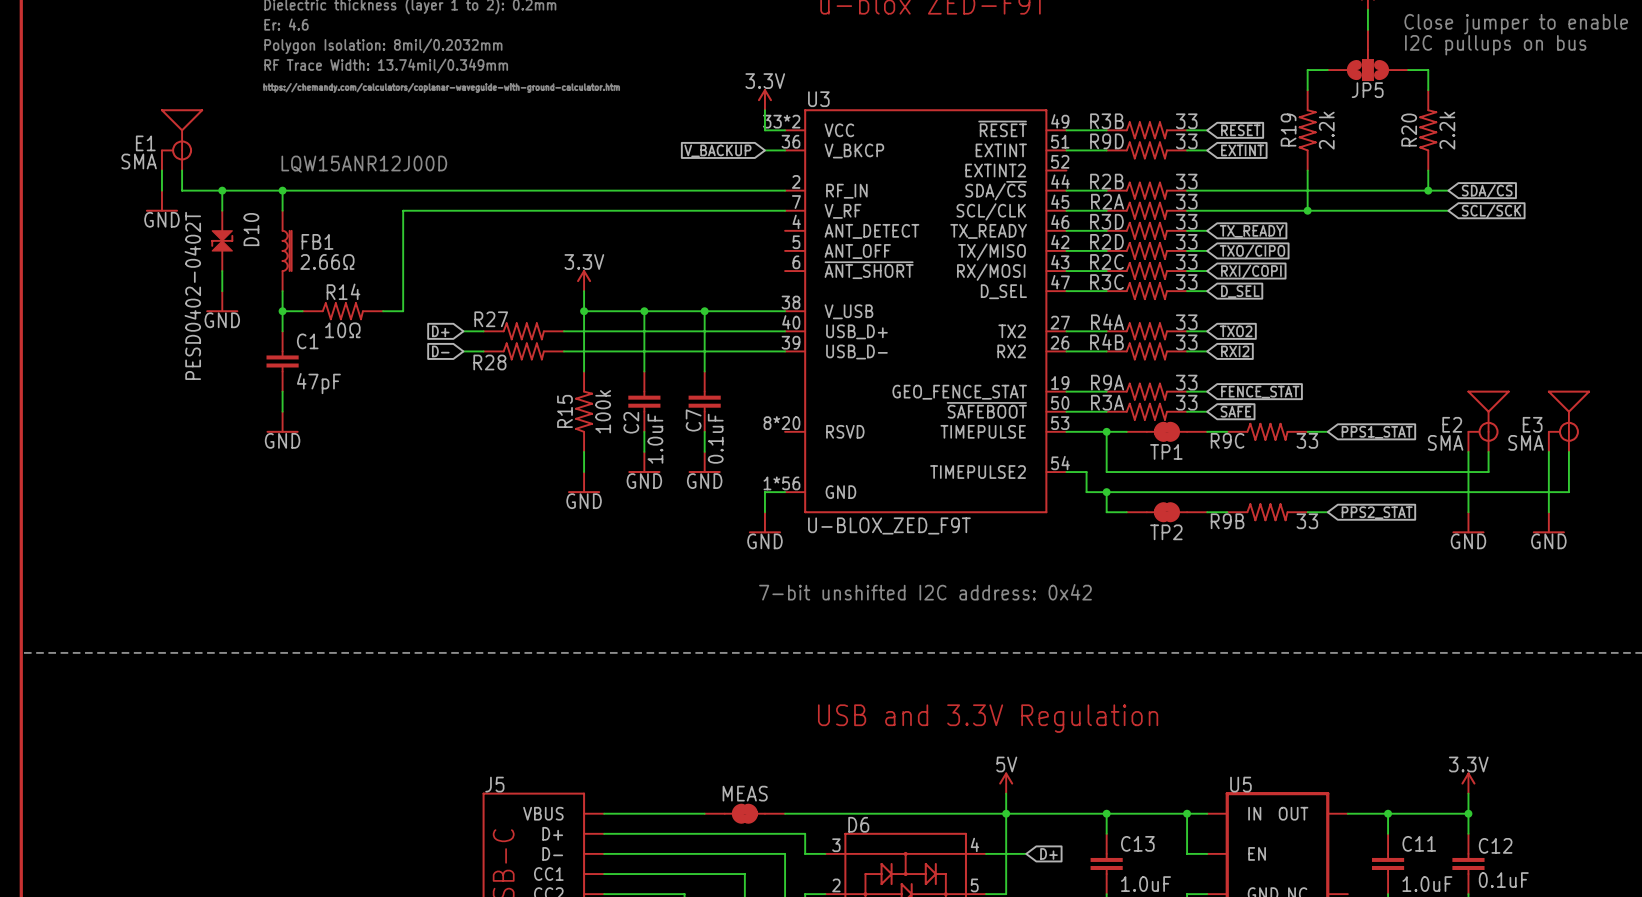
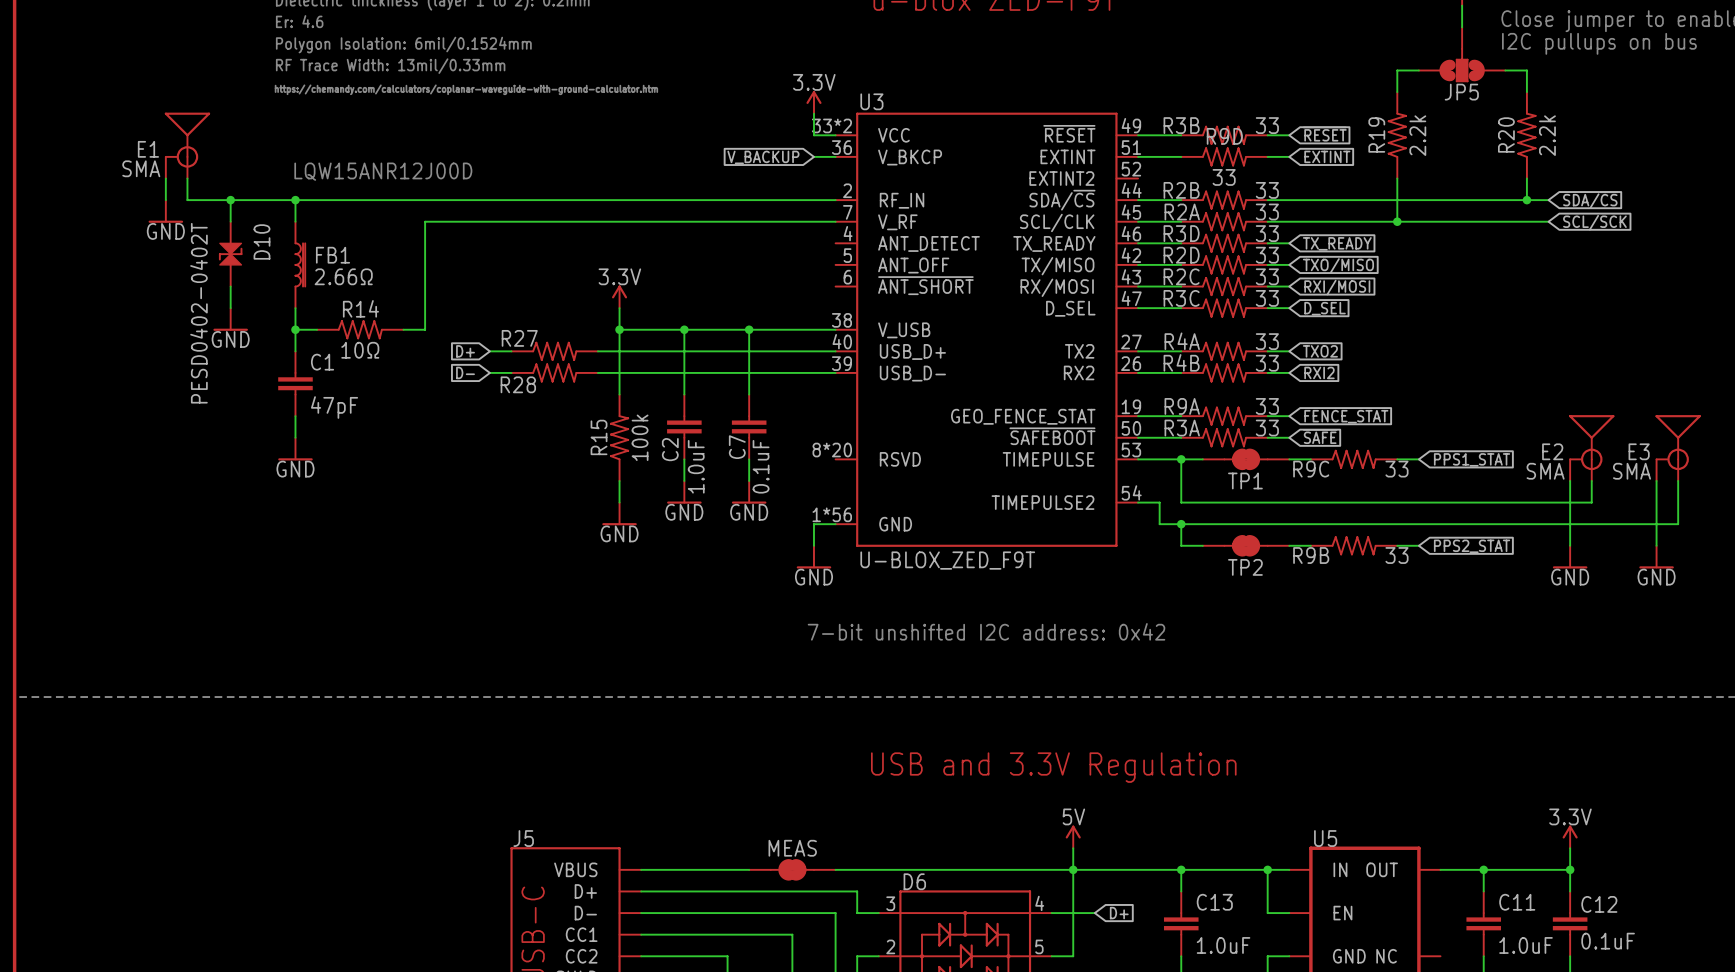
text: Polygon Isolation: 8mil/0.2032mm (383, 46) -> Polygon Isolation: 6mil/0.1524mm (403, 45)
text: RF Trace Width: 13.74mil/0.349mm (386, 65) -> RF Trace Width: 13mil/0.33mm (390, 66)
R9D name position: R9D (1106, 141) -> R9D (1224, 136)
R9D value position: 33 (1186, 141) -> 33 (1224, 177)
global label: TXO/CIPO (1252, 251) -> TXO/MISO (1338, 265)
global label: RXI/COPI (1251, 271) -> RXI/MOSI (1337, 287)

